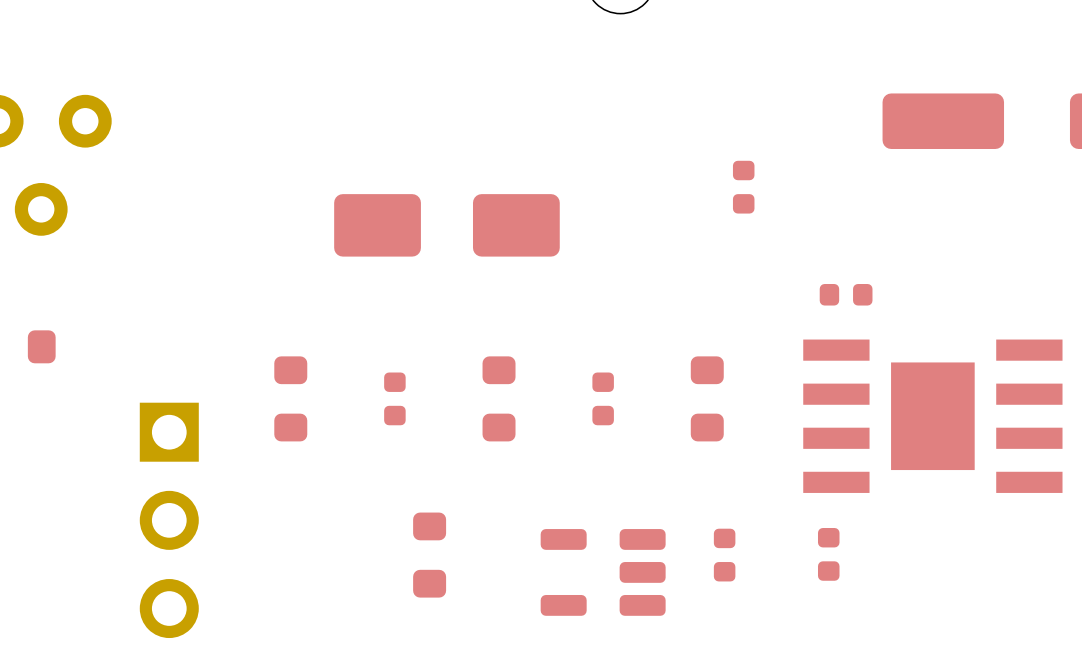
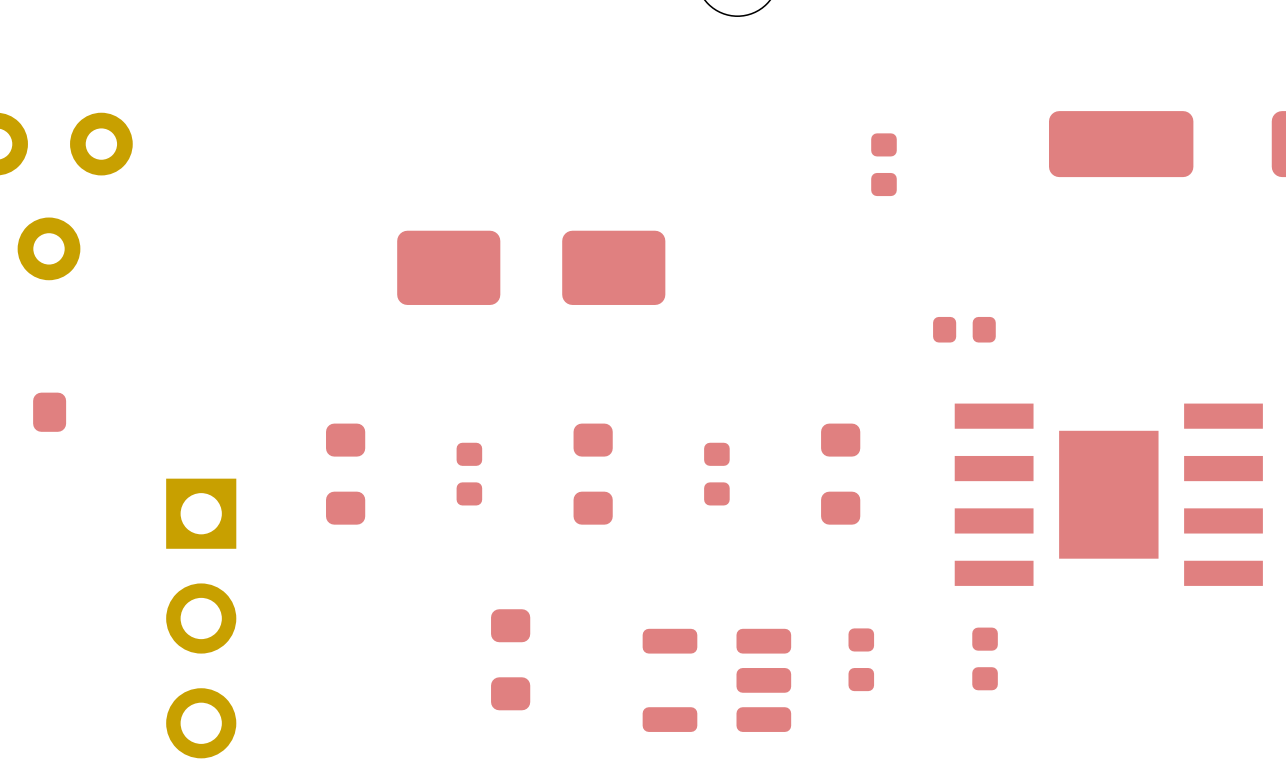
part position: (743, 187) -> (883, 164)
part position: (846, 294) -> (964, 329)

